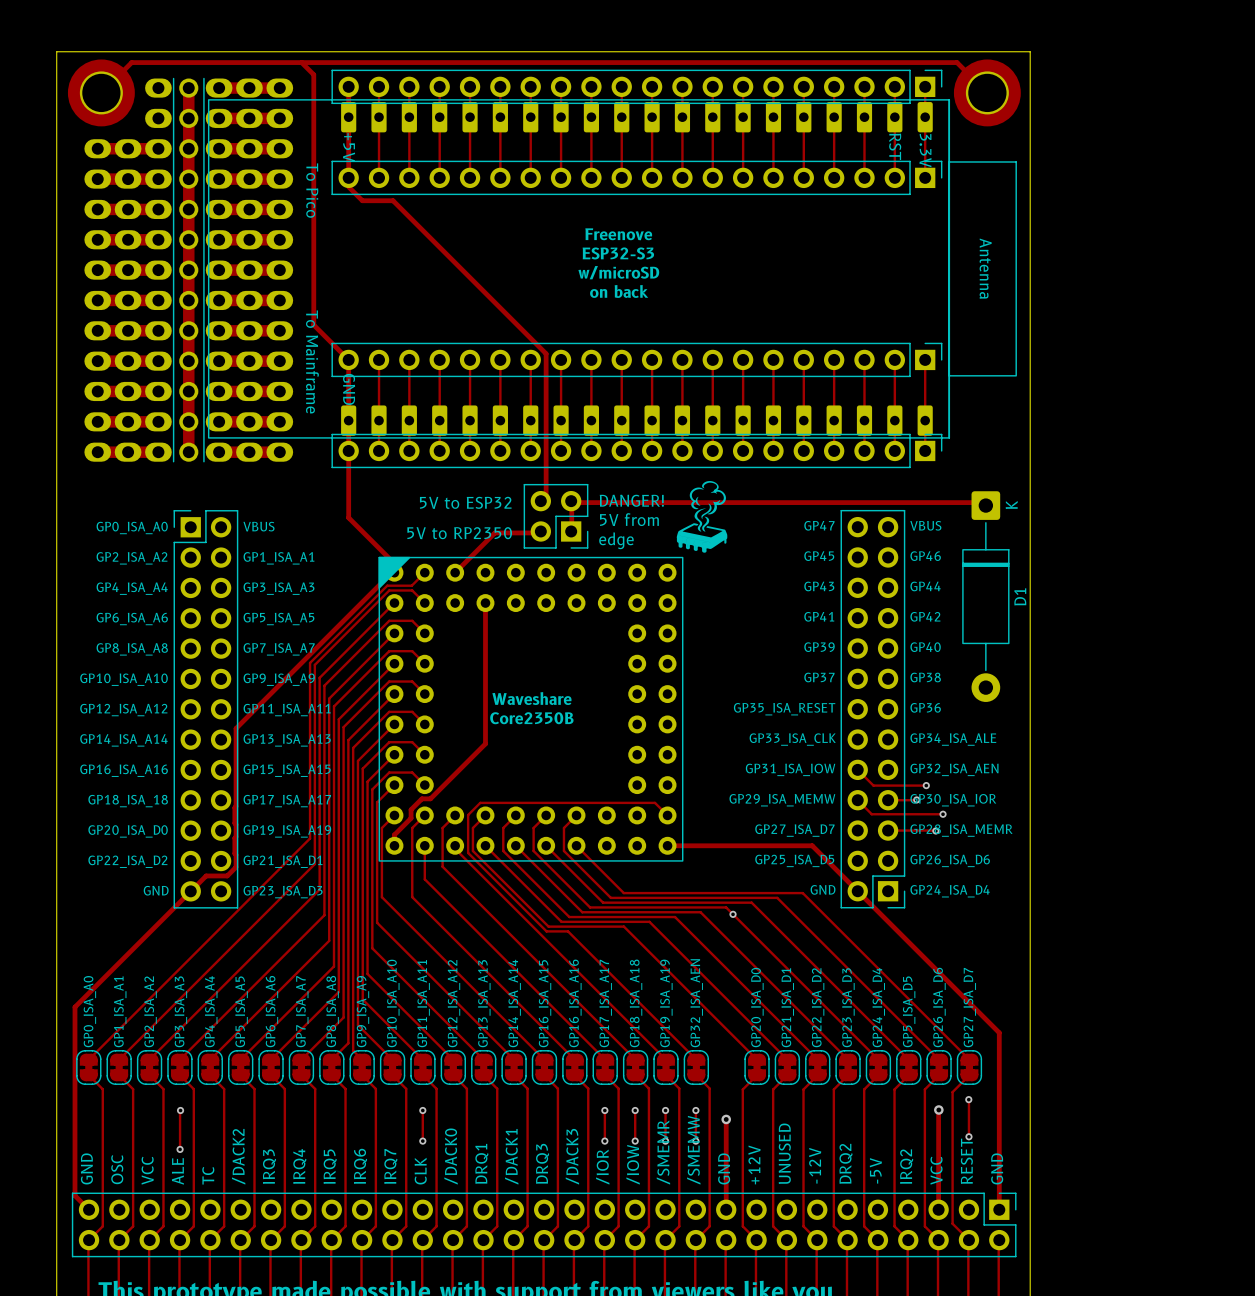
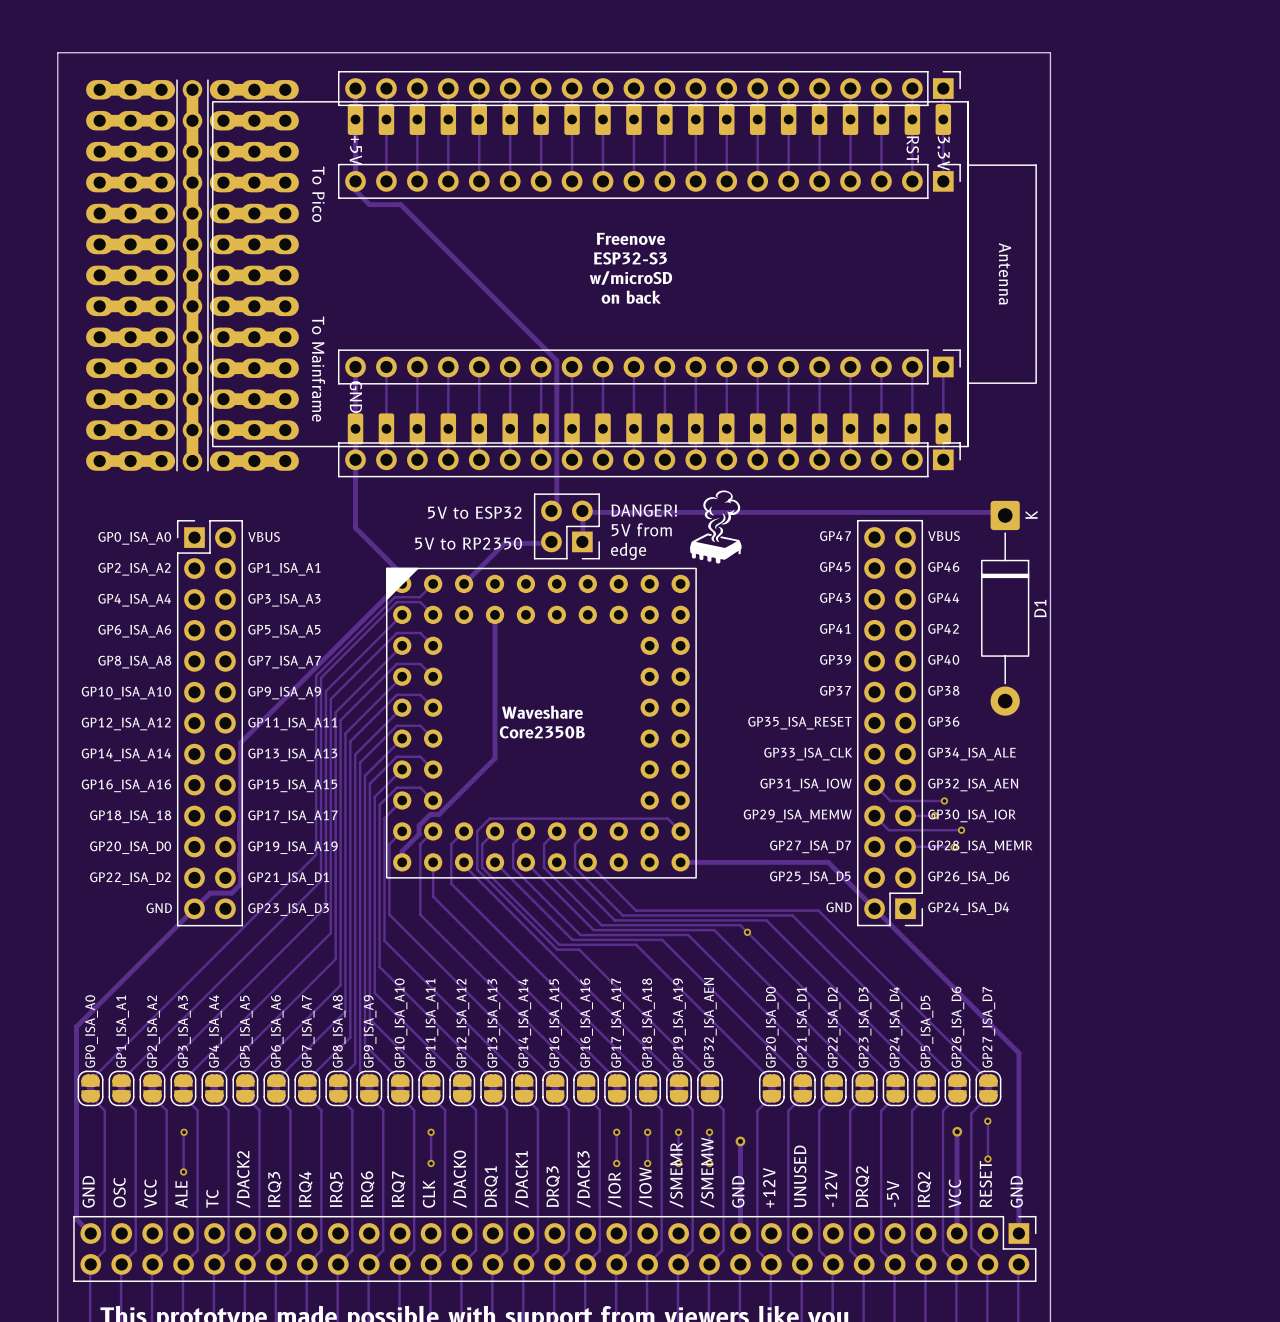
track: (301, 62) (313, 74) (313, 325) (348, 359) -> none
track: (119, 74) (131, 62) (957, 62) (968, 74) -> none
part footprint: [84, 77, 294, 463] -> [86, 79, 299, 472]
part: (101, 92) -> none
part: (987, 92) -> none

